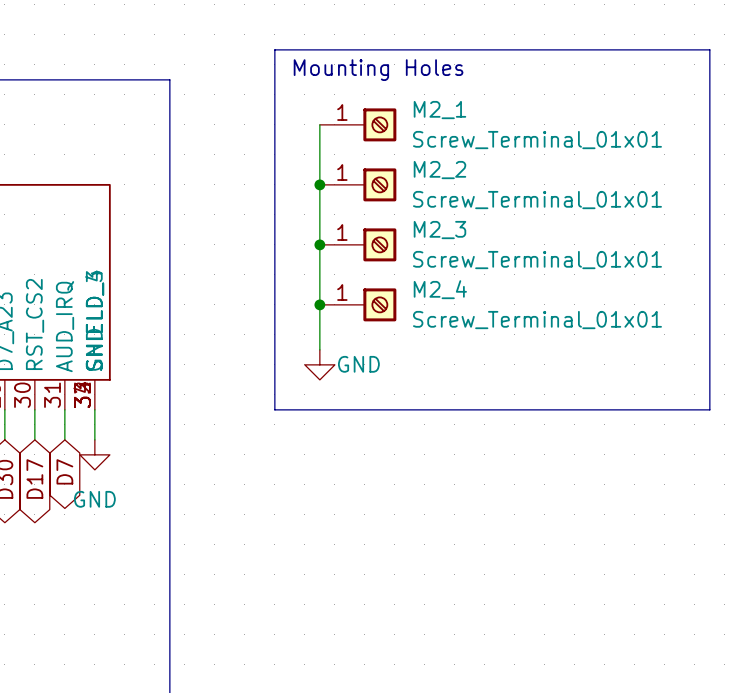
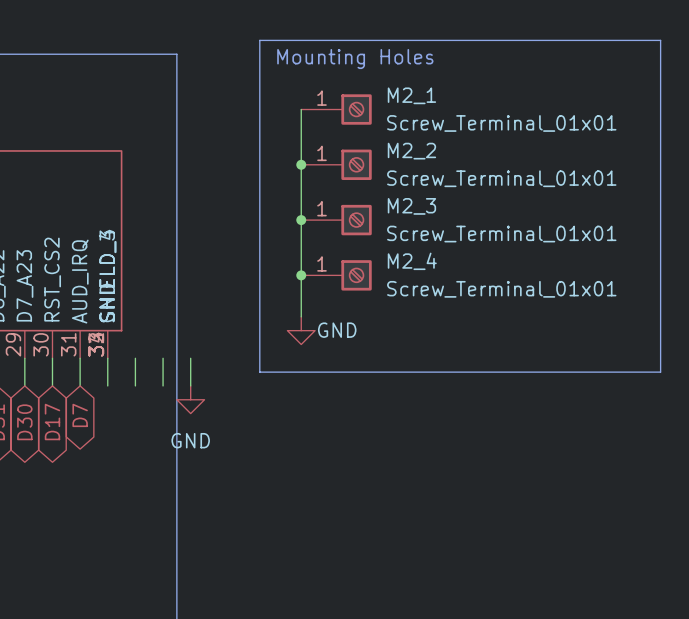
line: (274, 49) (709, 49) (709, 409) (274, 409) (274, 49) -> (259, 40) (660, 40) (660, 372) (259, 372) (259, 40)
text position: Mounting Holes (378, 70) -> Mounting Holes (355, 59)
wire: (319, 124) (319, 349) -> (301, 109) (301, 316)
M2_1 position: (358, 124) -> (336, 109)
junction position: (319, 184) -> (301, 164)
M2_2 position: (358, 184) -> (336, 164)
junction position: (319, 244) -> (301, 220)
M2_3 position: (358, 244) -> (336, 220)
junction position: (319, 304) -> (301, 275)
M2_4 position: (358, 304) -> (336, 275)
power symbol position: GND (319, 364) -> GND (301, 330)
wire: none -> (135, 358) (135, 385)
wire: none -> (163, 358) (163, 385)
wire: none -> (190, 358) (190, 385)
power symbol: GND (94, 454) -> none
power symbol: none -> GND (190, 399)

